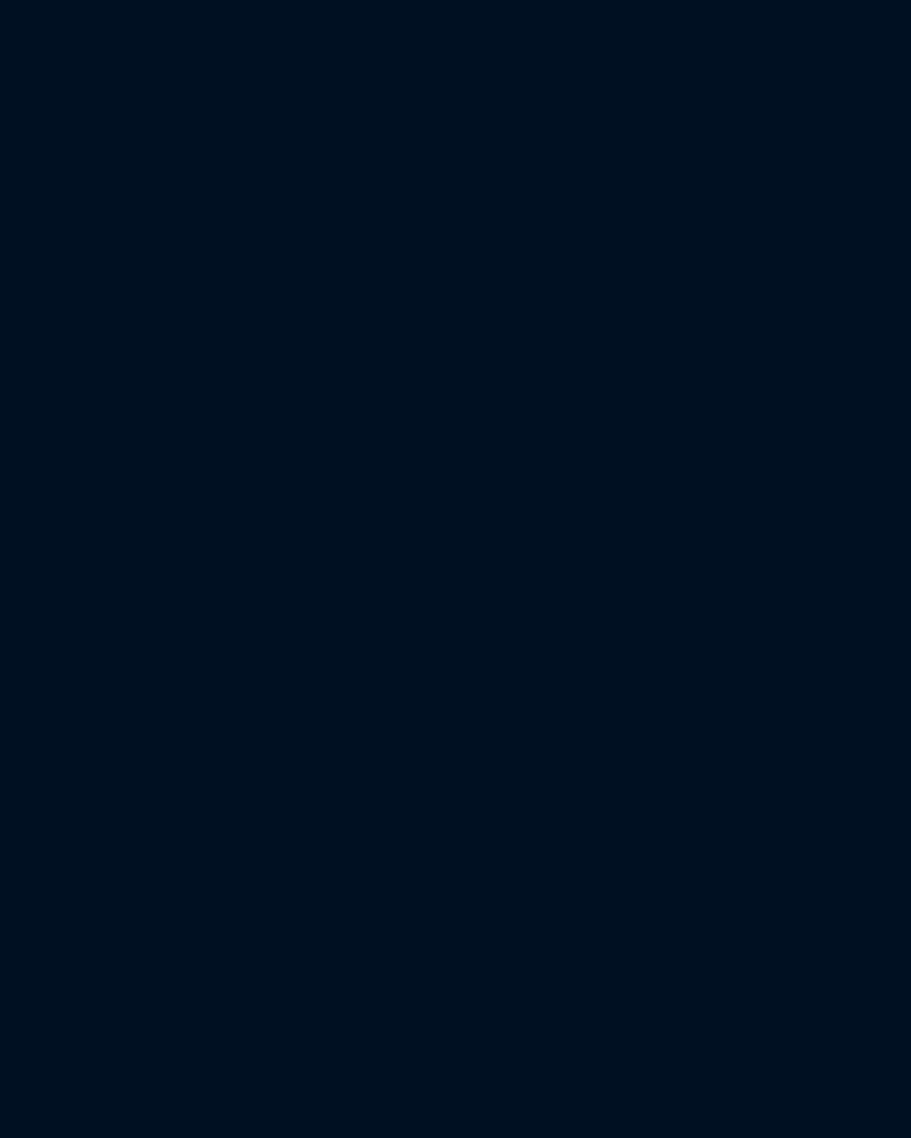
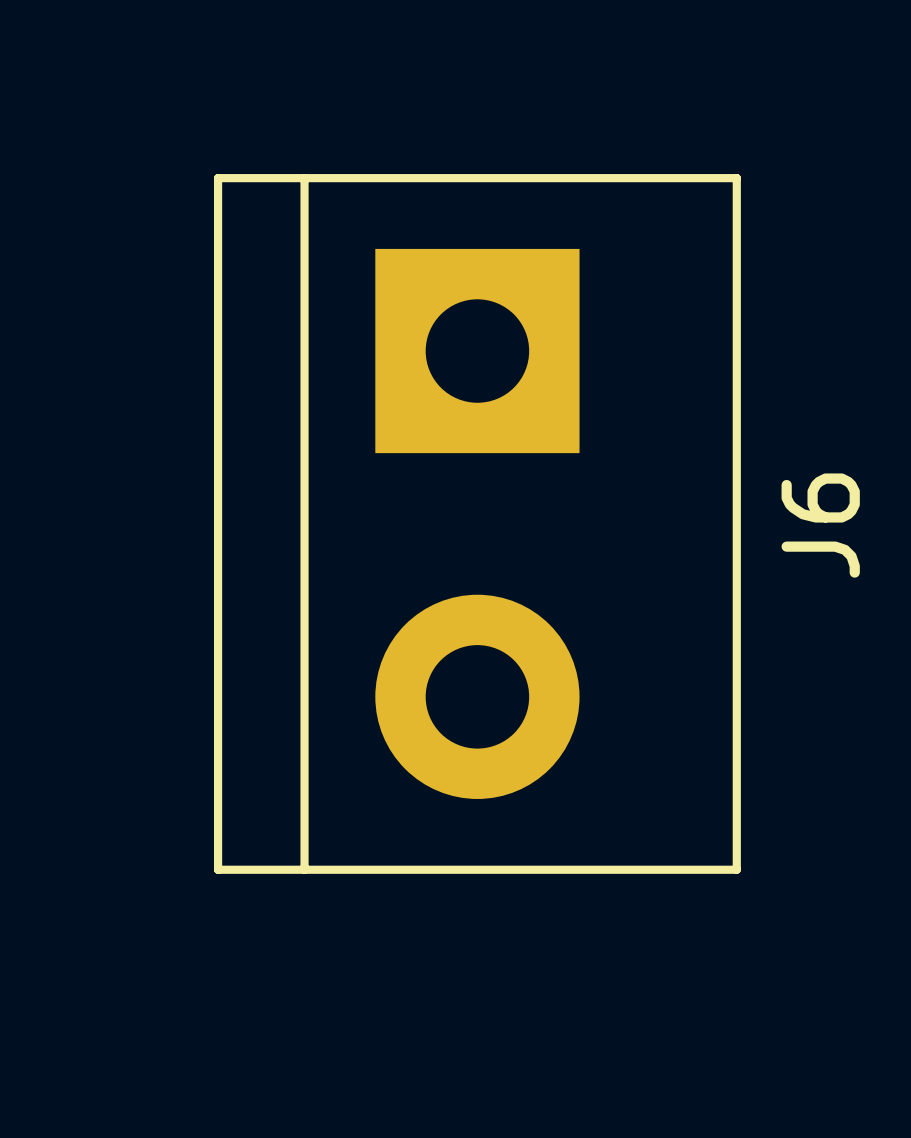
J6: none -> (477, 523)

